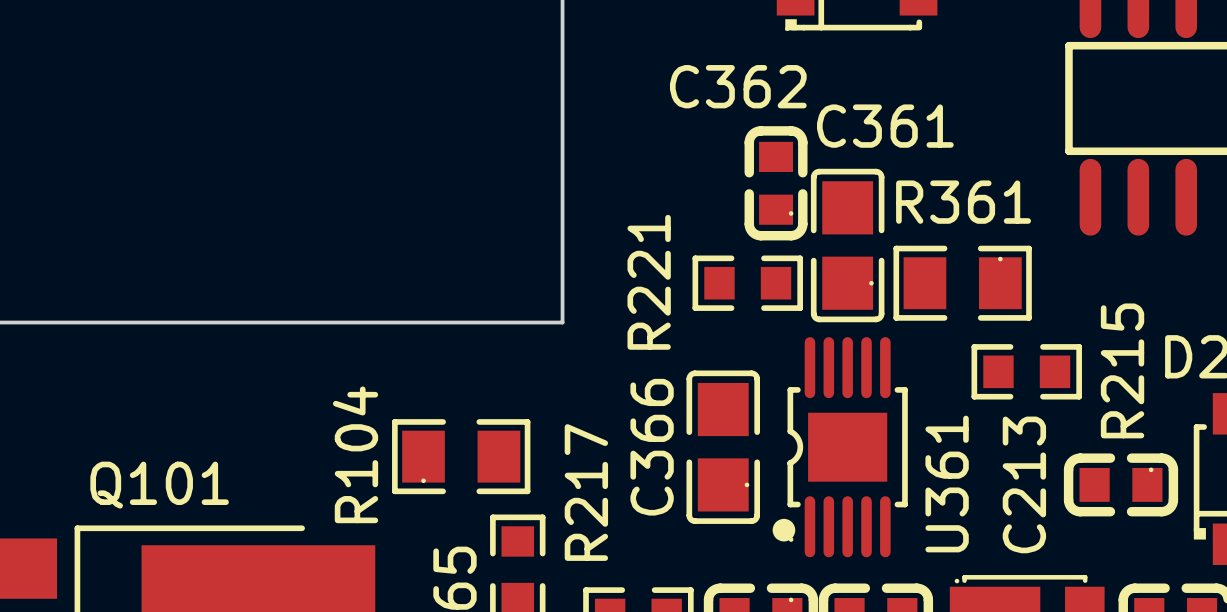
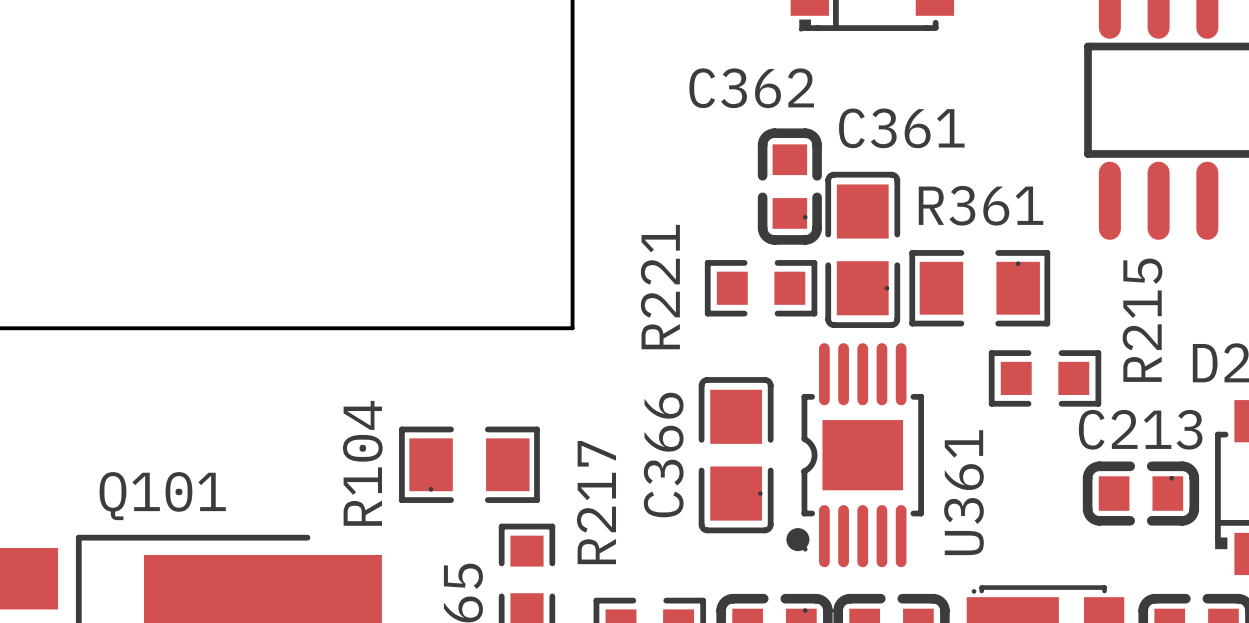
R215 name position: R215 (1122, 370) -> R215 (1142, 320)
C213 name rotation: 0° (1024, 484) -> 90° clockwise (1140, 429)

